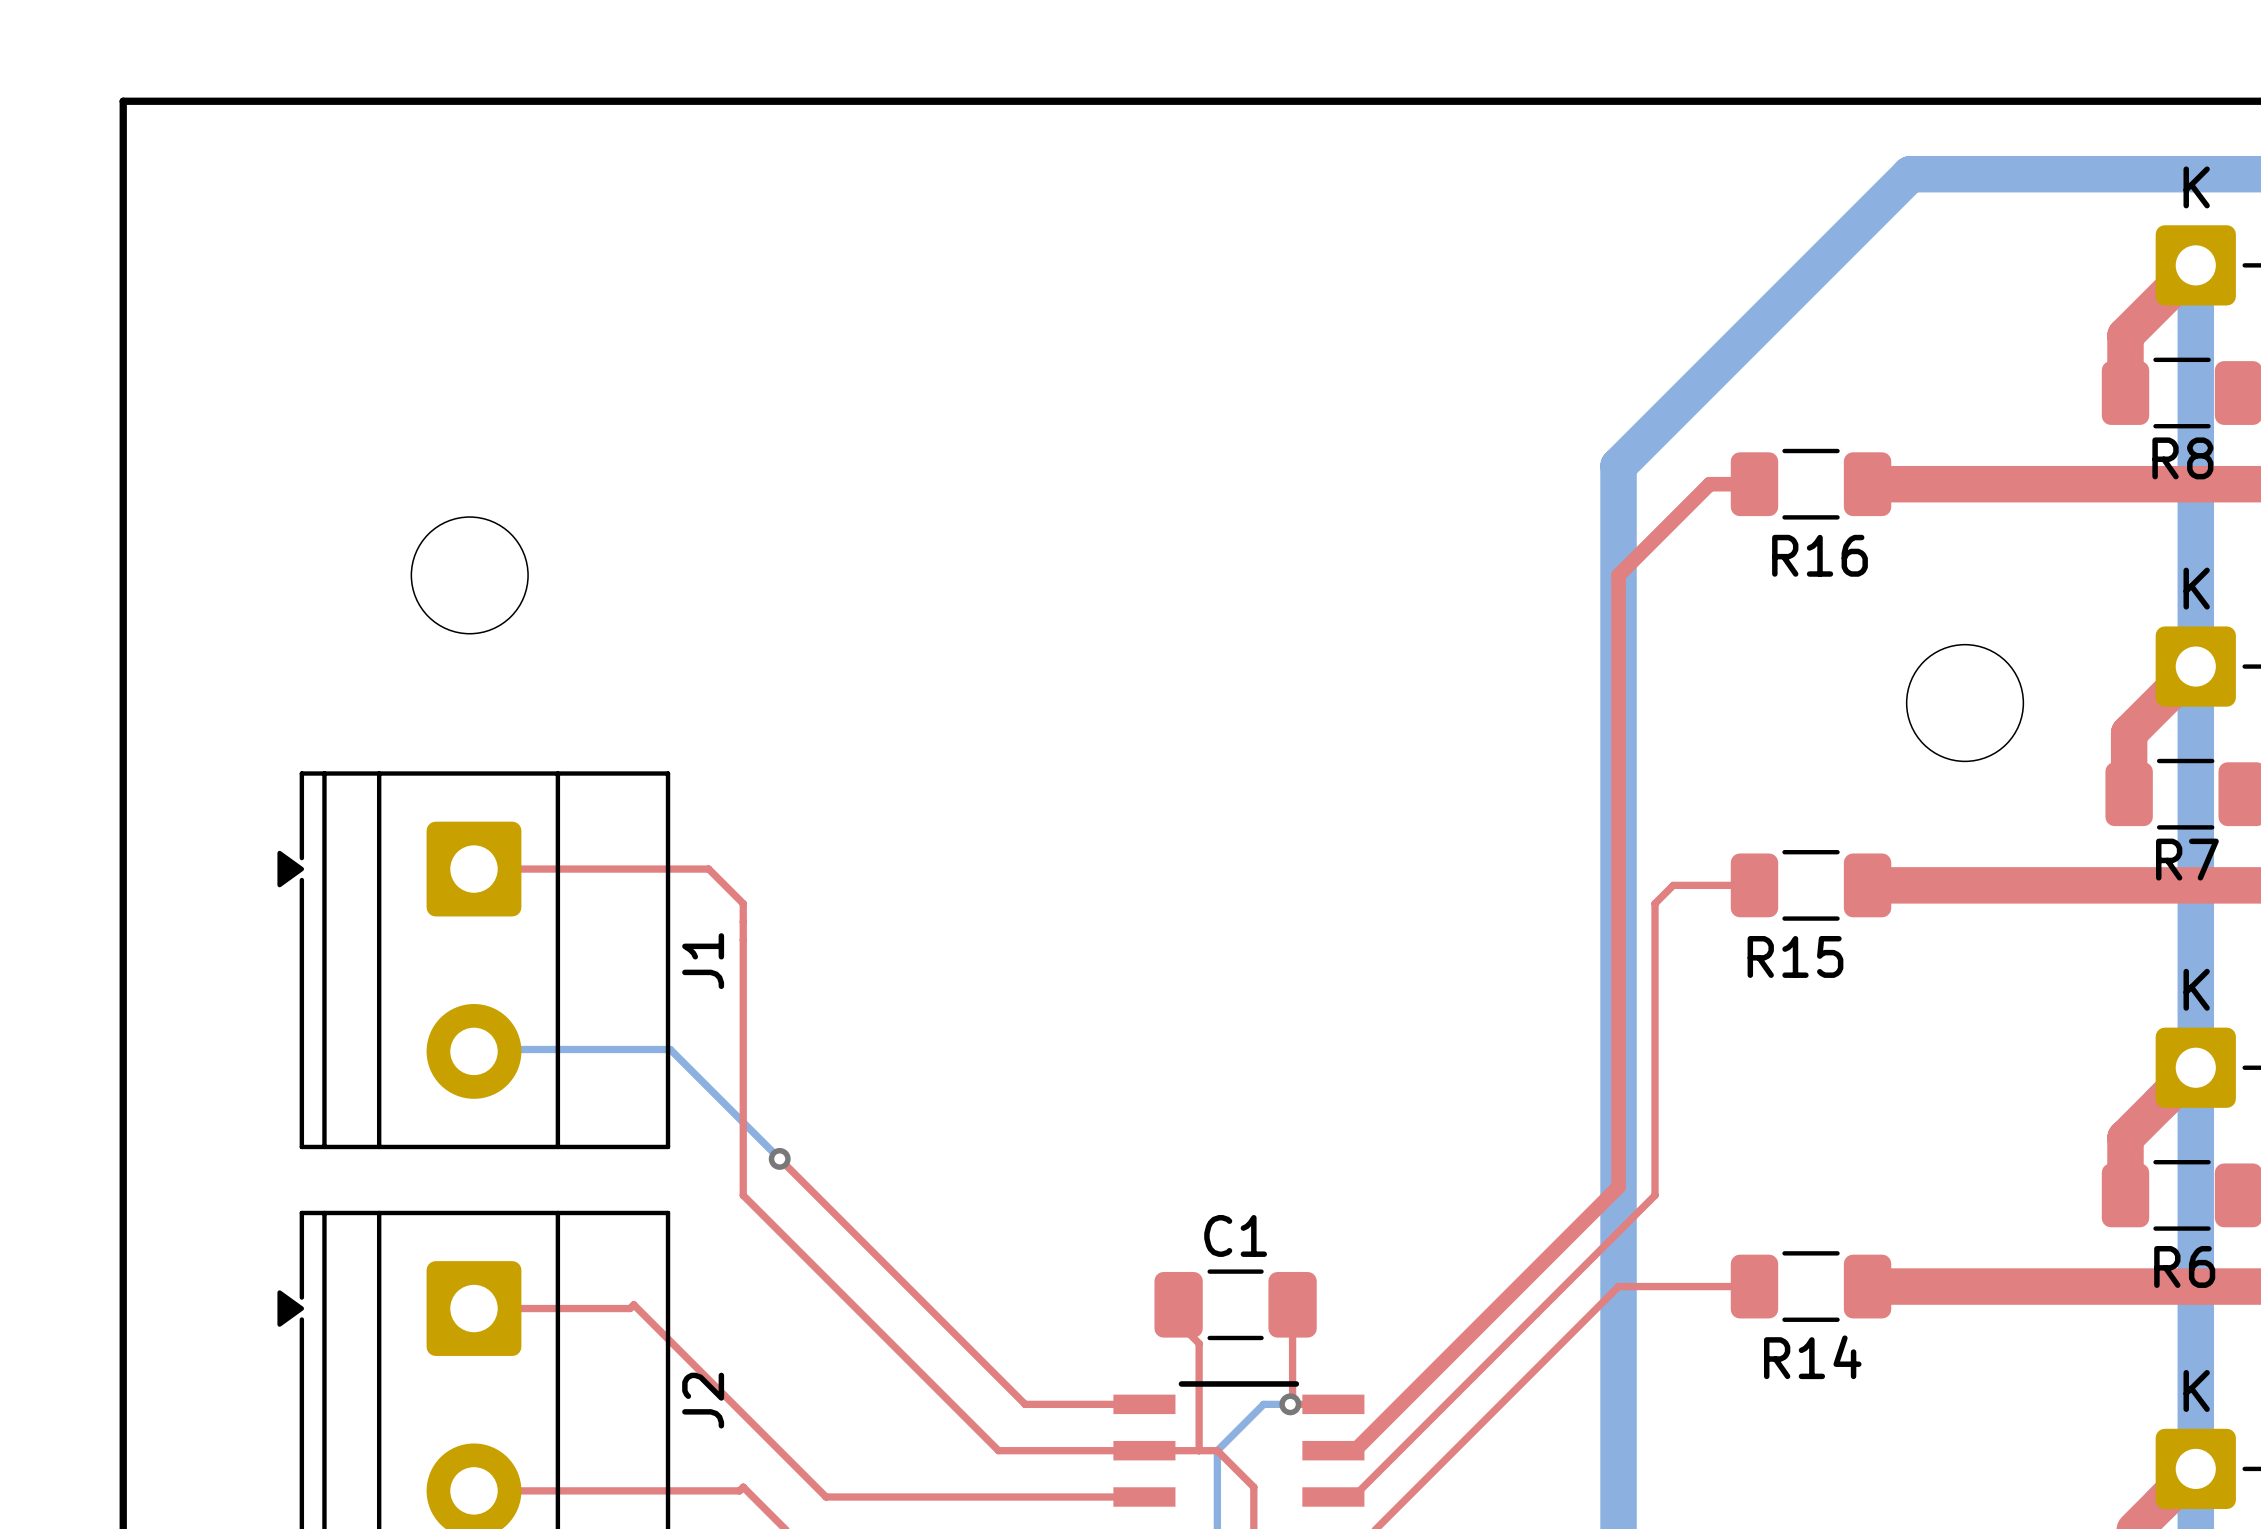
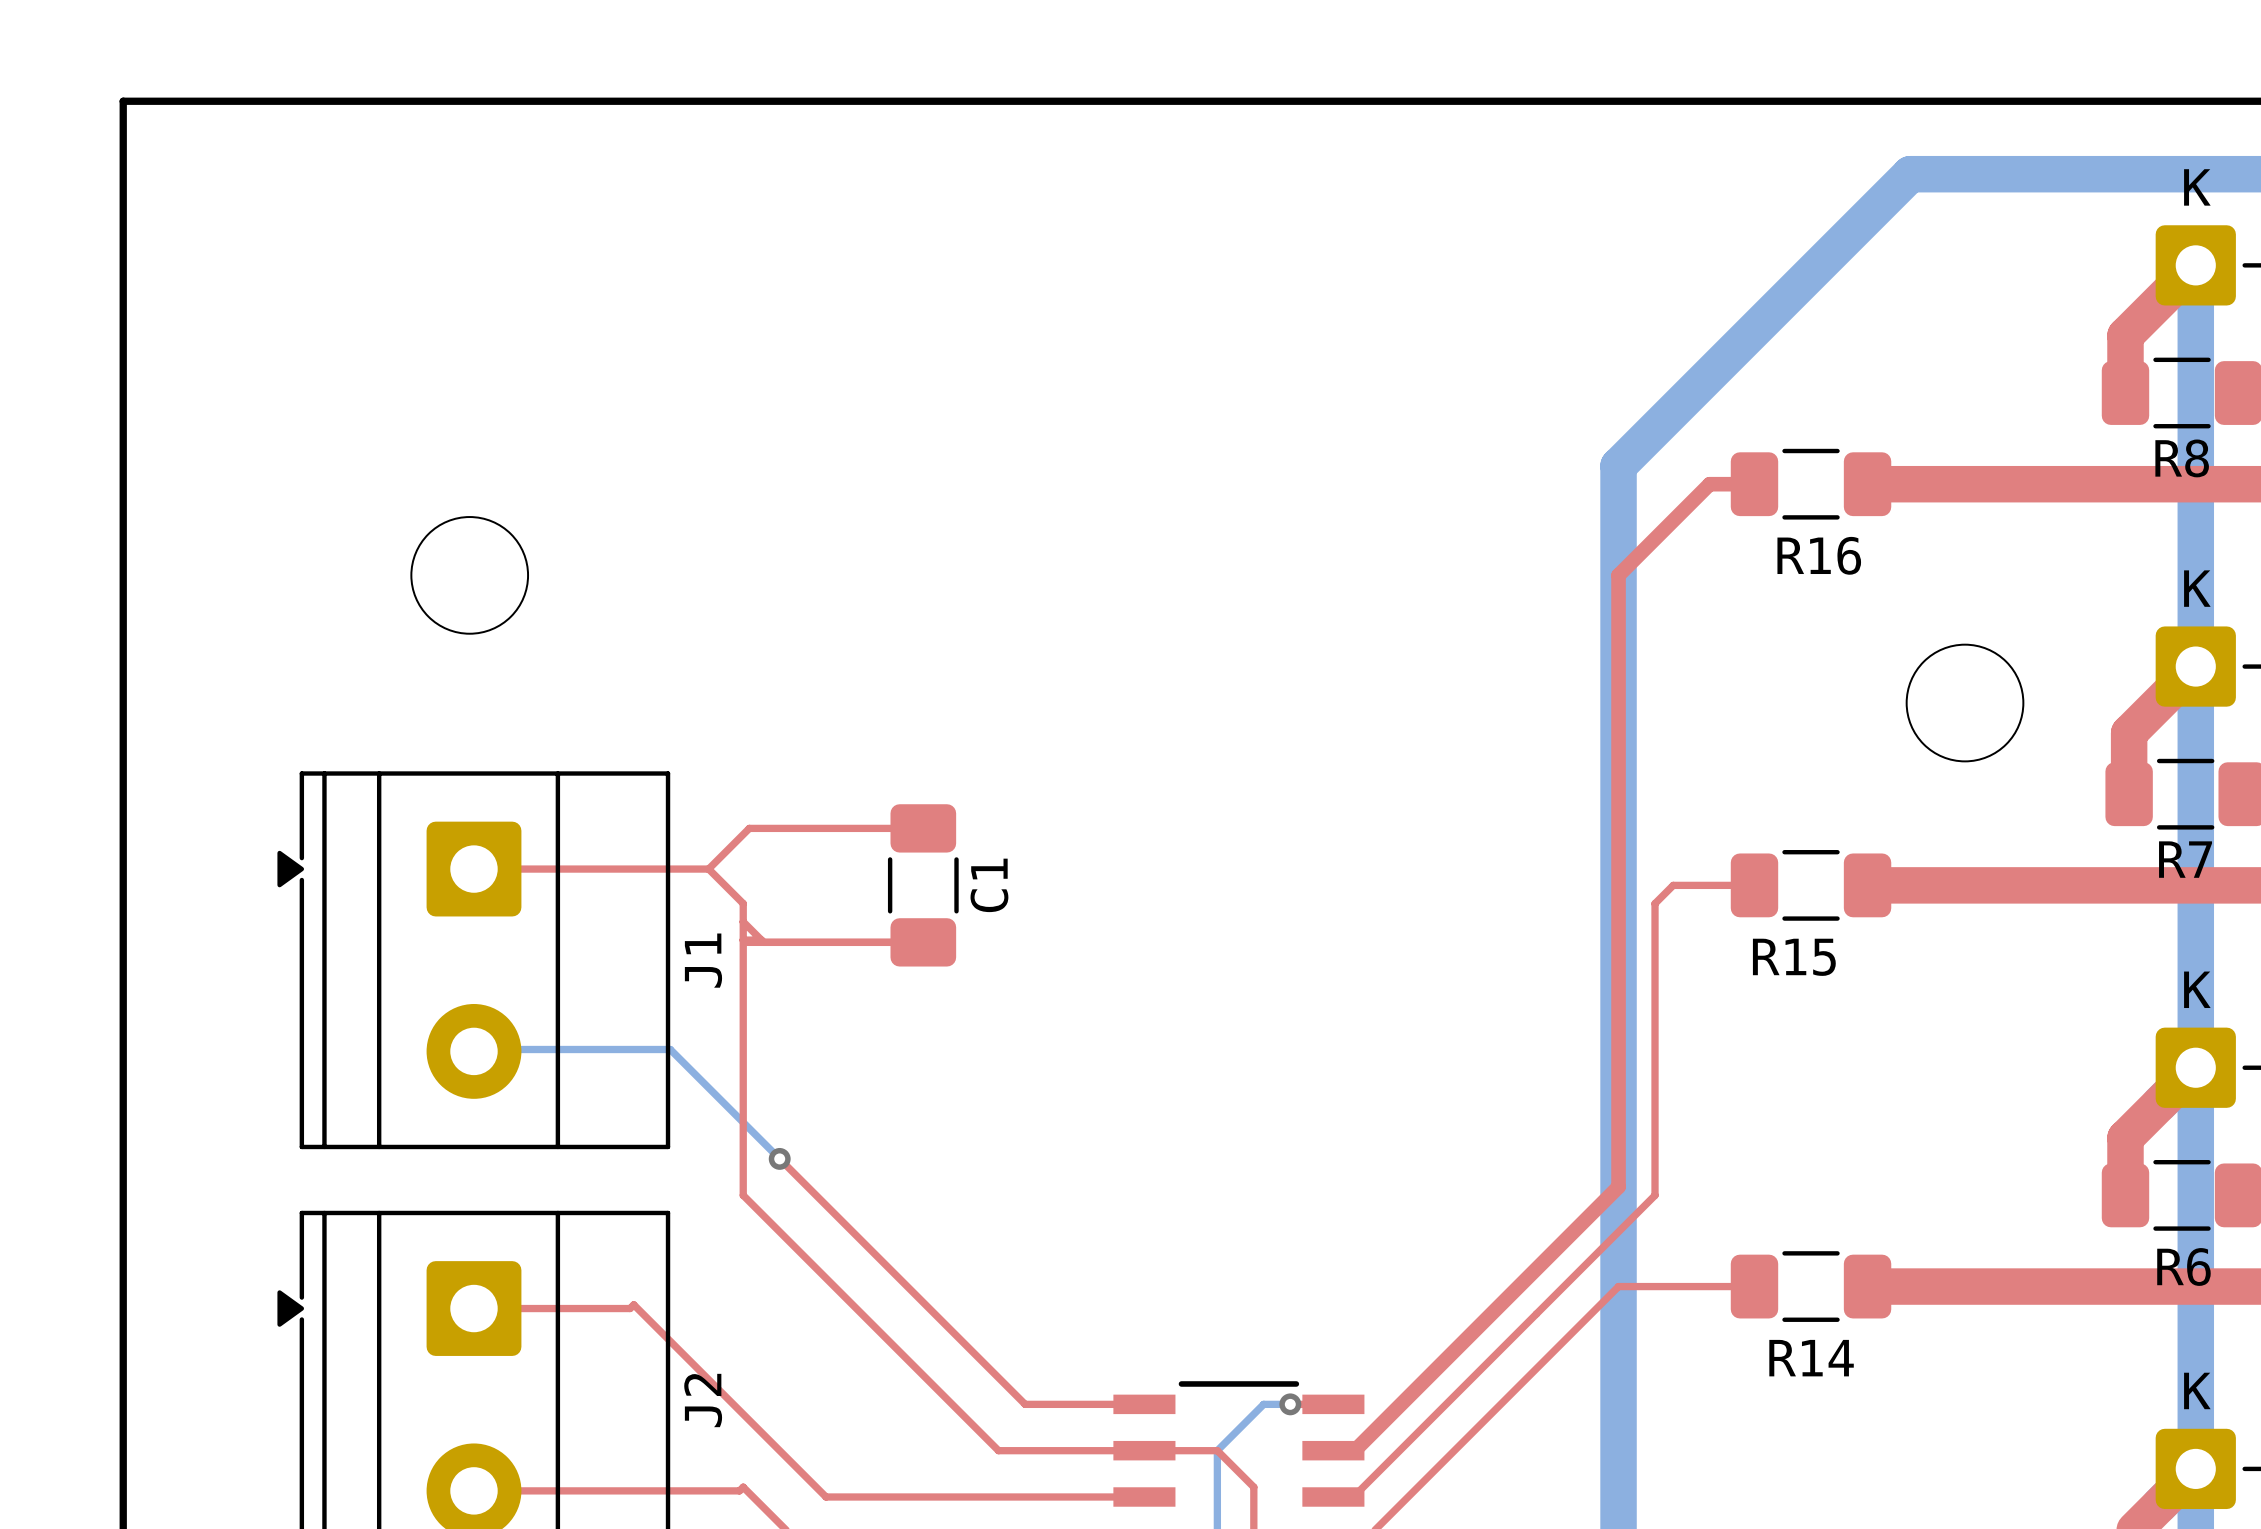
top track: none -> (923, 828) (749, 828) (708, 869)
top track: none -> (743, 921) (763, 942)
top track: none -> (761, 940) (743, 940) (745, 942) (923, 942)
C1 rotation: 0° (1235, 1304) -> 90° clockwise (923, 885)
C1 position: (1235, 1304) -> (923, 885)
top track: (1178, 1323) (1199, 1343) (1199, 1450) -> none
top track: (1292, 1323) (1292, 1402) (1290, 1404) -> none

